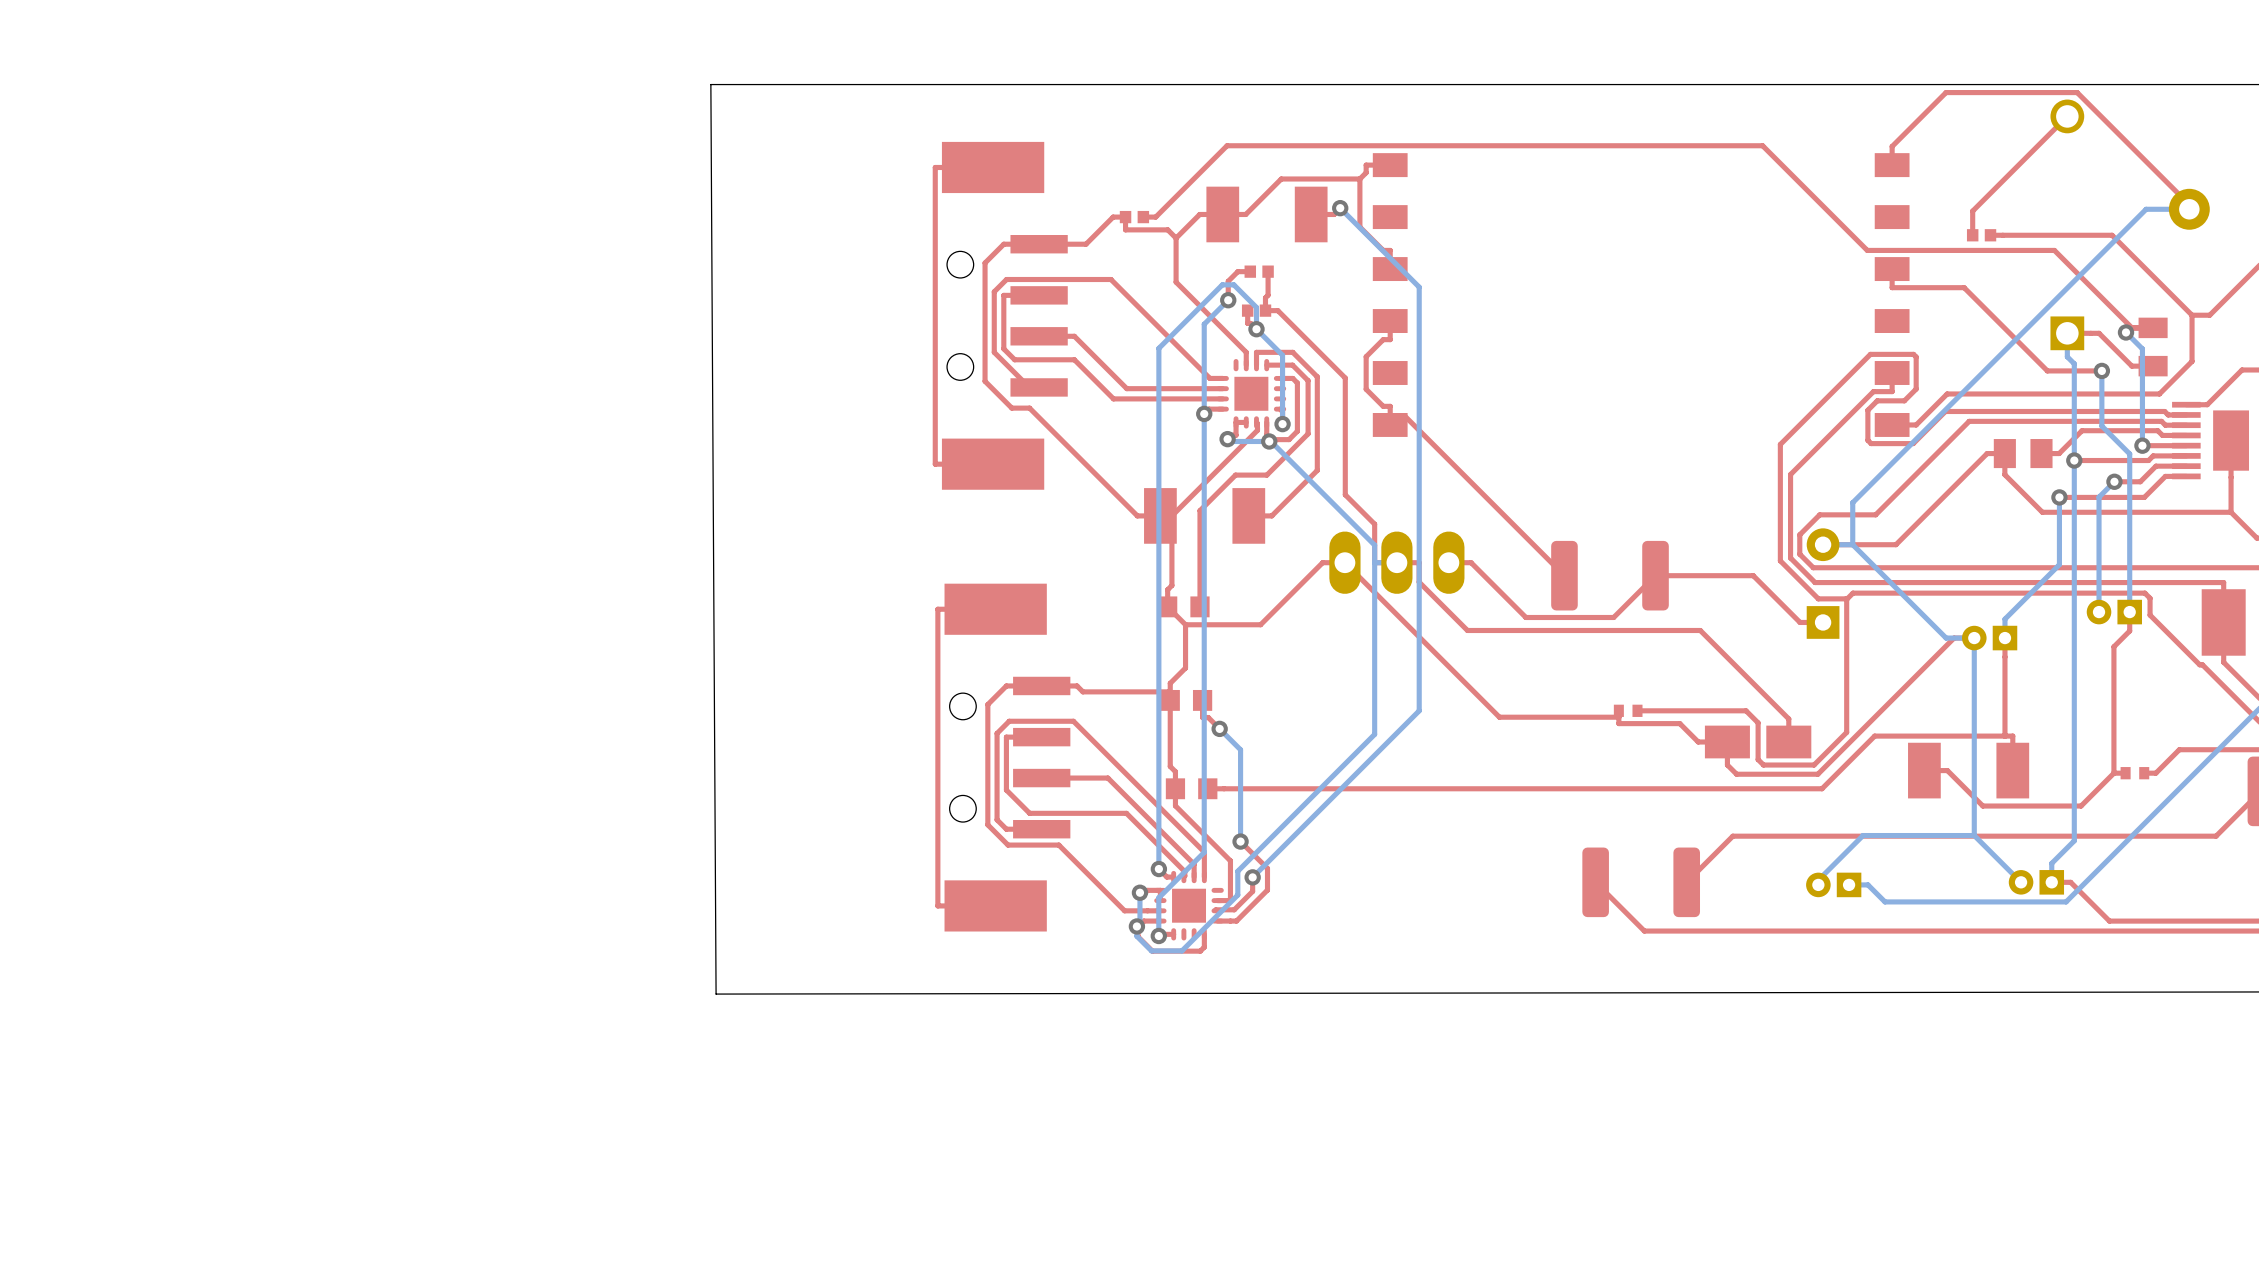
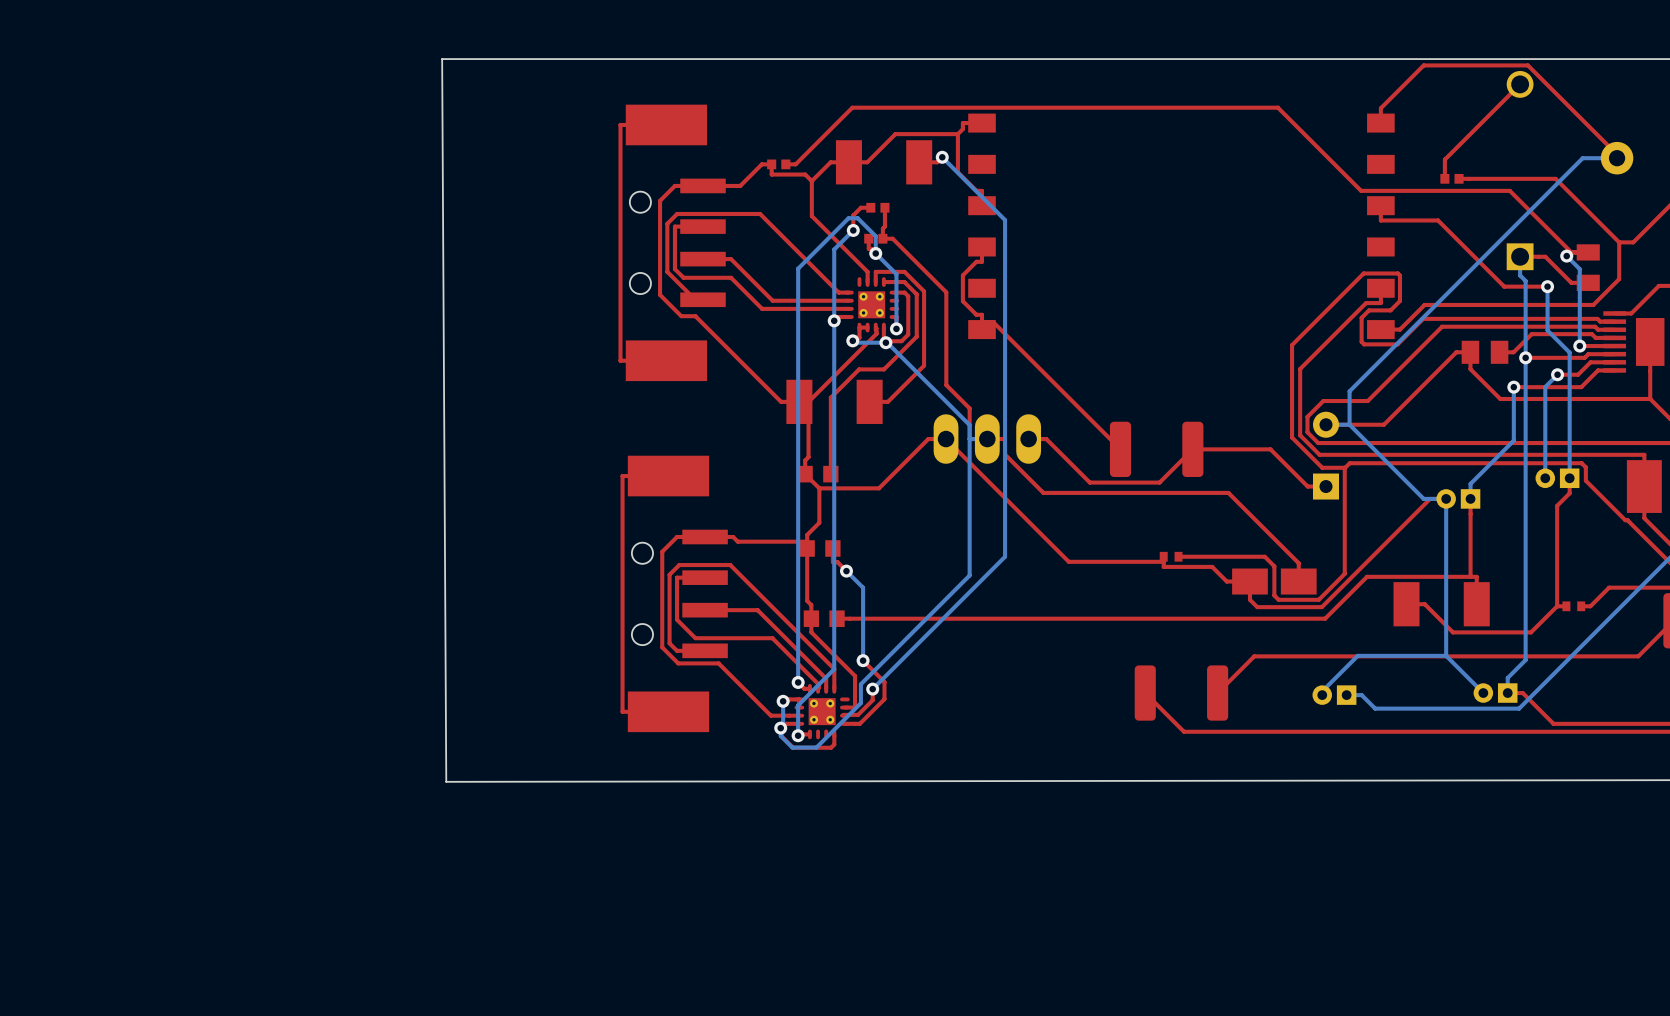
part footprint: [1216, 359, 1287, 429] -> [844, 277, 900, 333]
part footprint: [1154, 870, 1224, 941] -> [794, 683, 850, 740]

